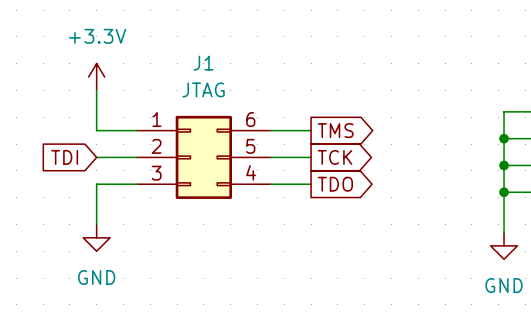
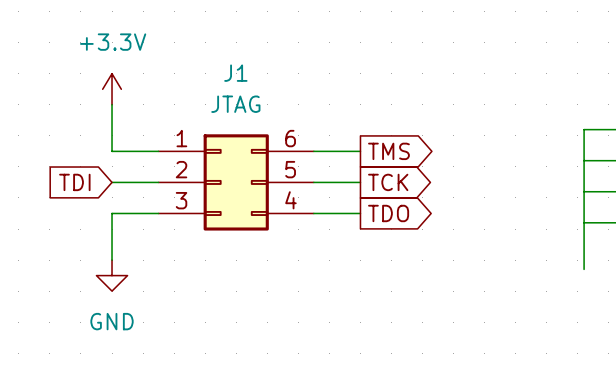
junction: (504, 138) -> none
junction: (504, 165) -> none
junction: (504, 192) -> none
power symbol: GND (504, 245) -> none

